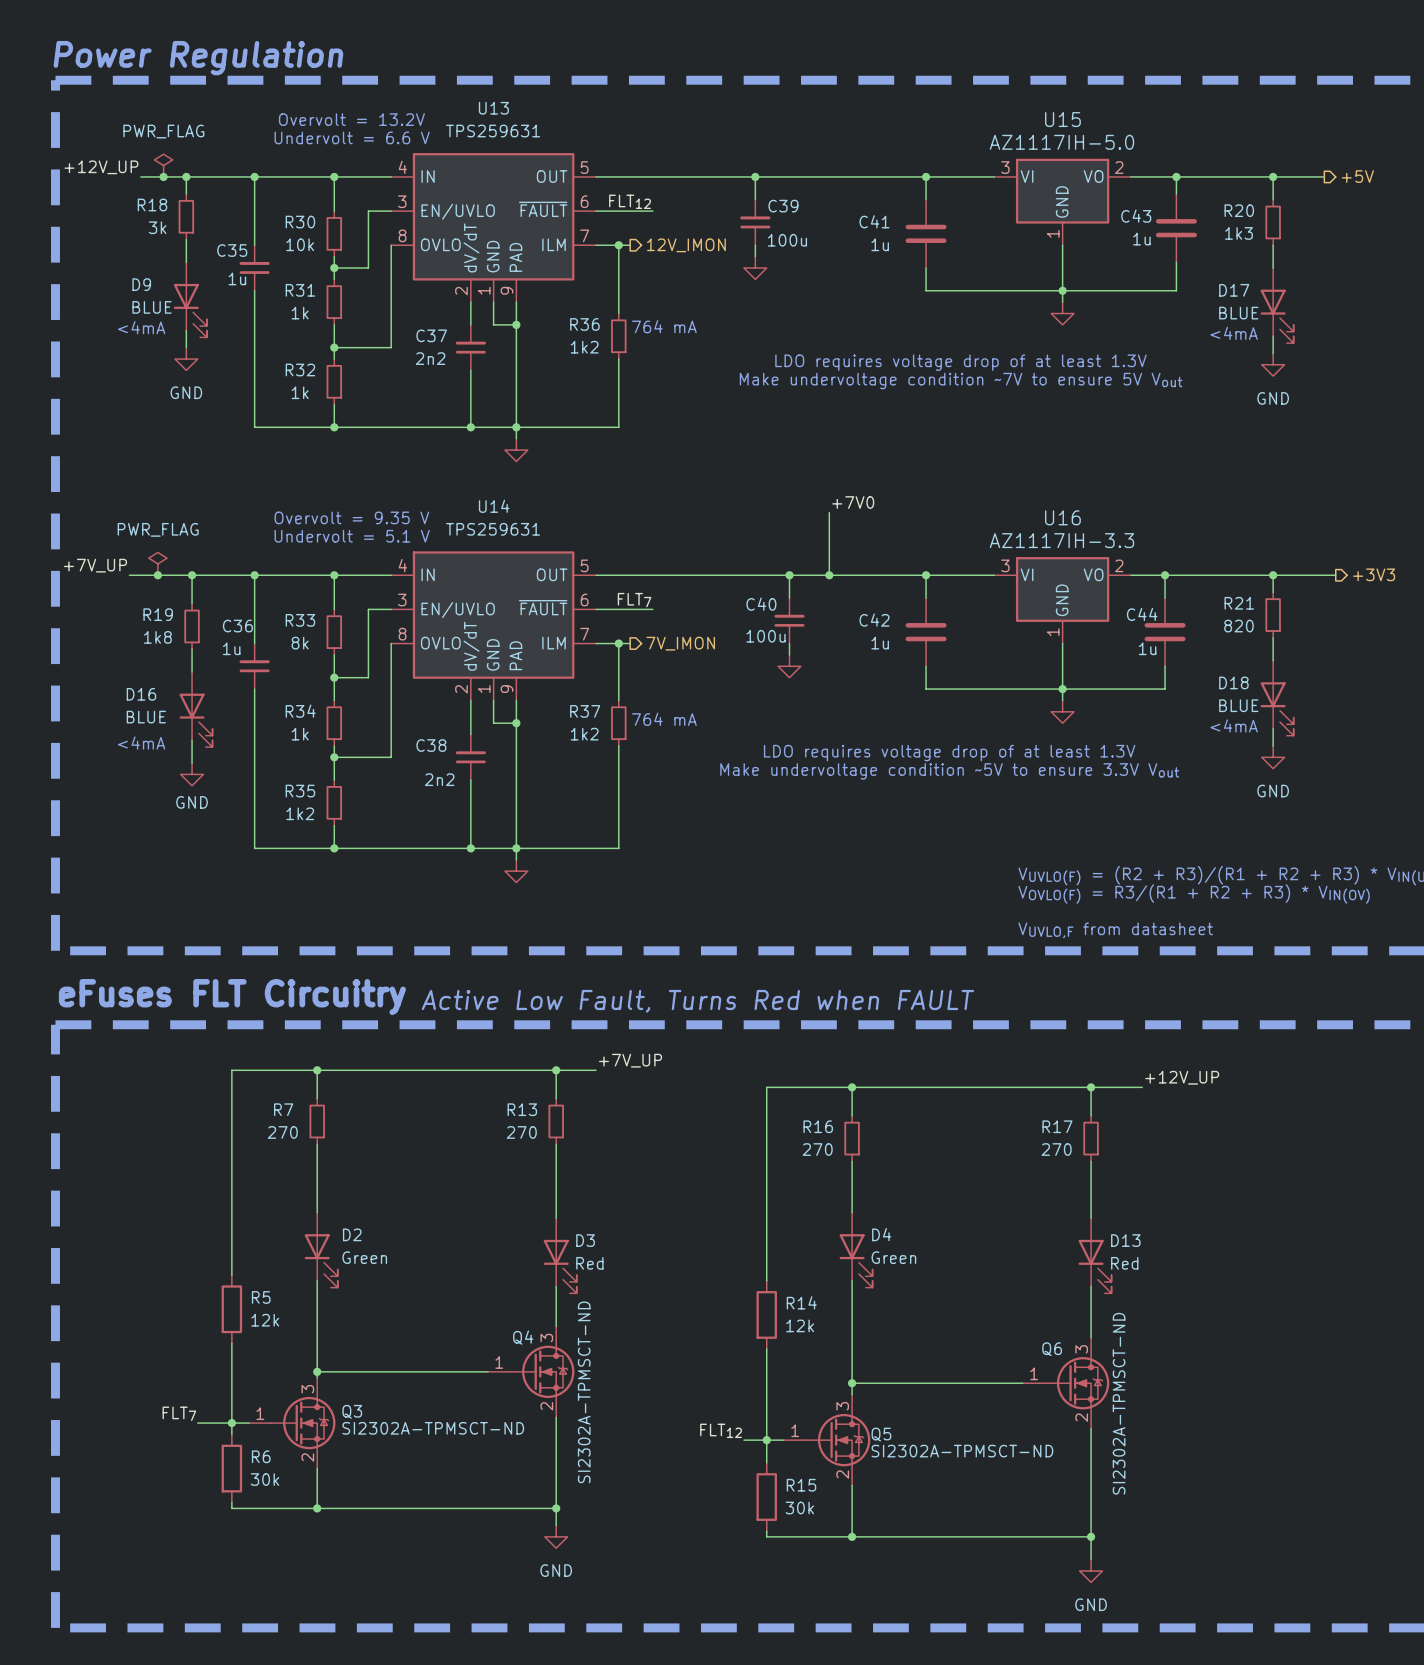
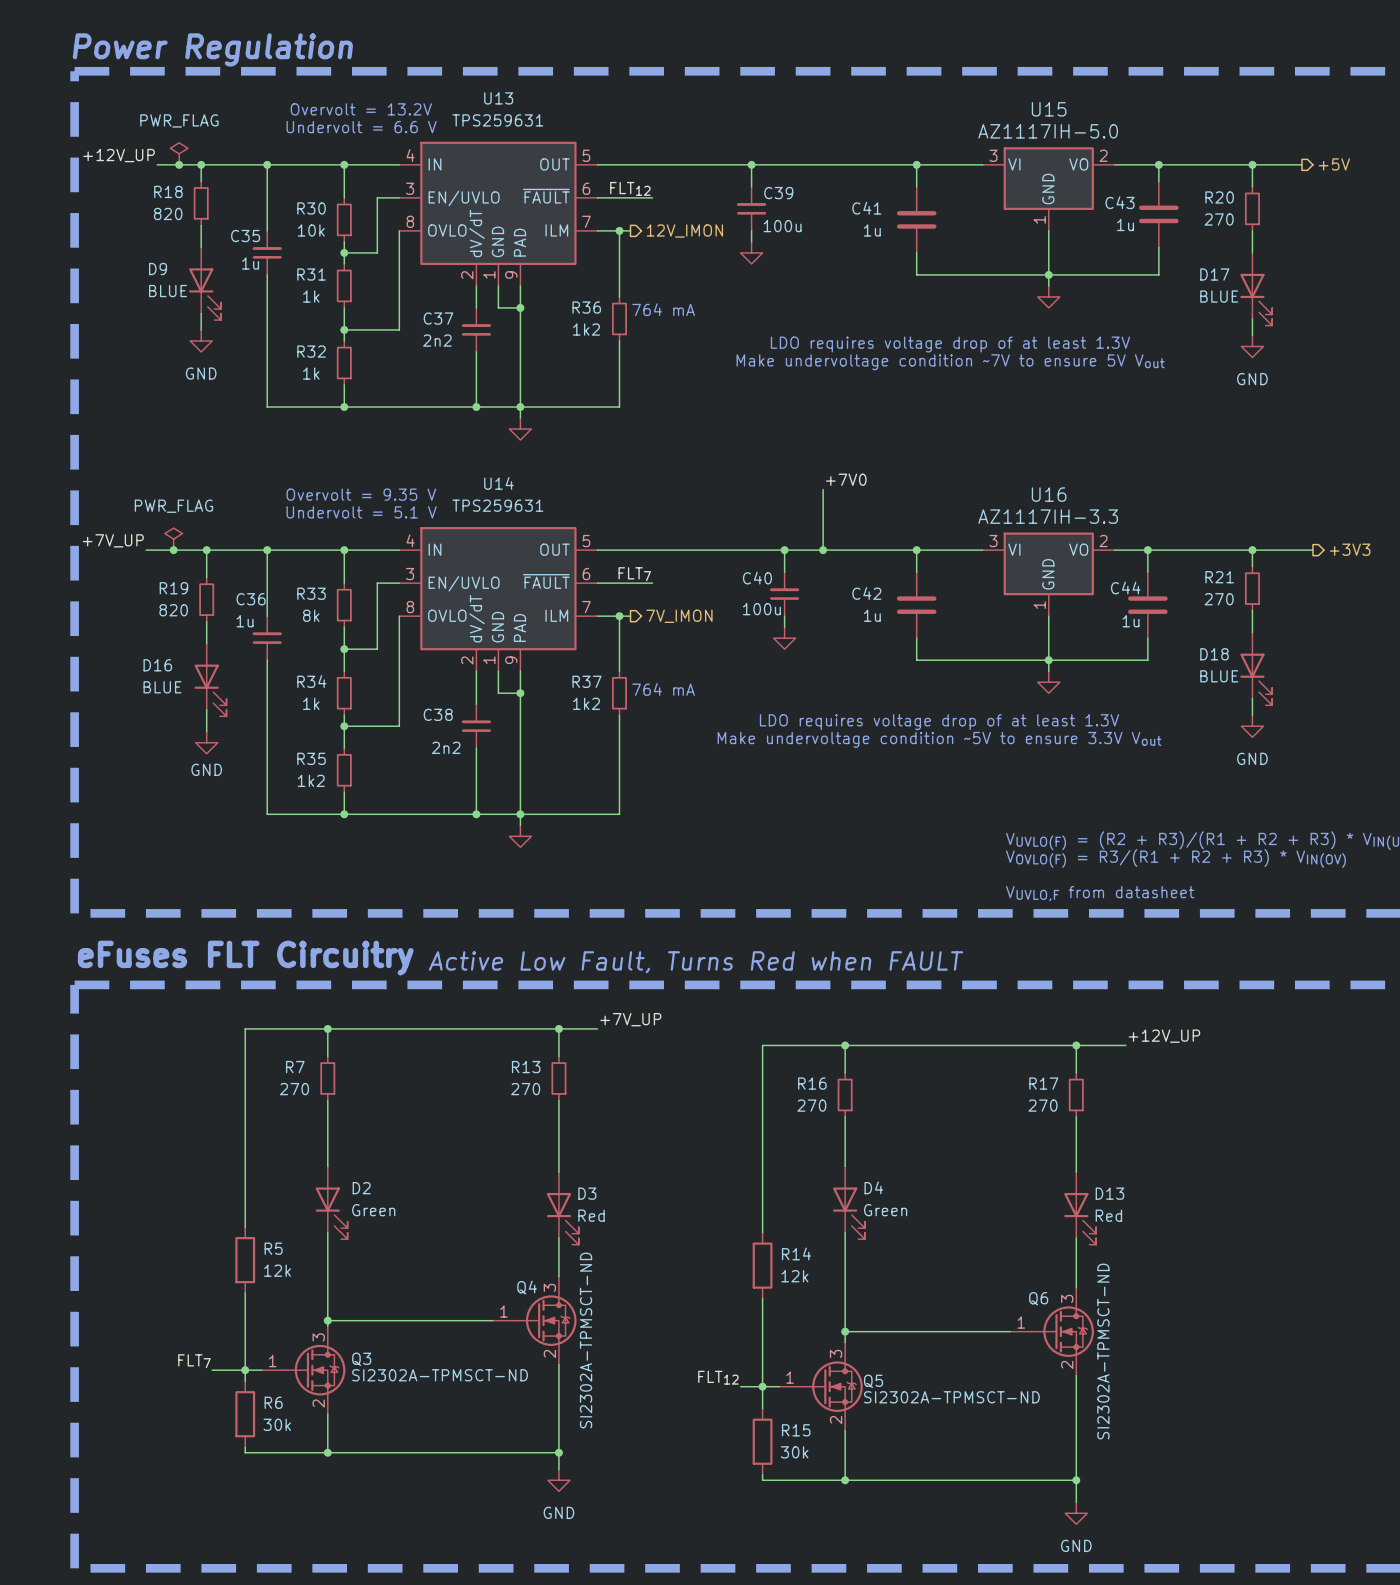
R18 value: 3k (157, 227) -> 820 (168, 213)
R20 value: 1k3 (1239, 233) -> 270 (1219, 219)
text: <4mA (141, 327) -> none
text: <4mA (1234, 333) -> none
R21 value: 820 (1239, 626) -> 270 (1219, 599)
R19 value: 1k8 (157, 637) -> 820 (173, 610)
text: <4mA (1234, 725) -> none
text: <4mA (141, 743) -> none

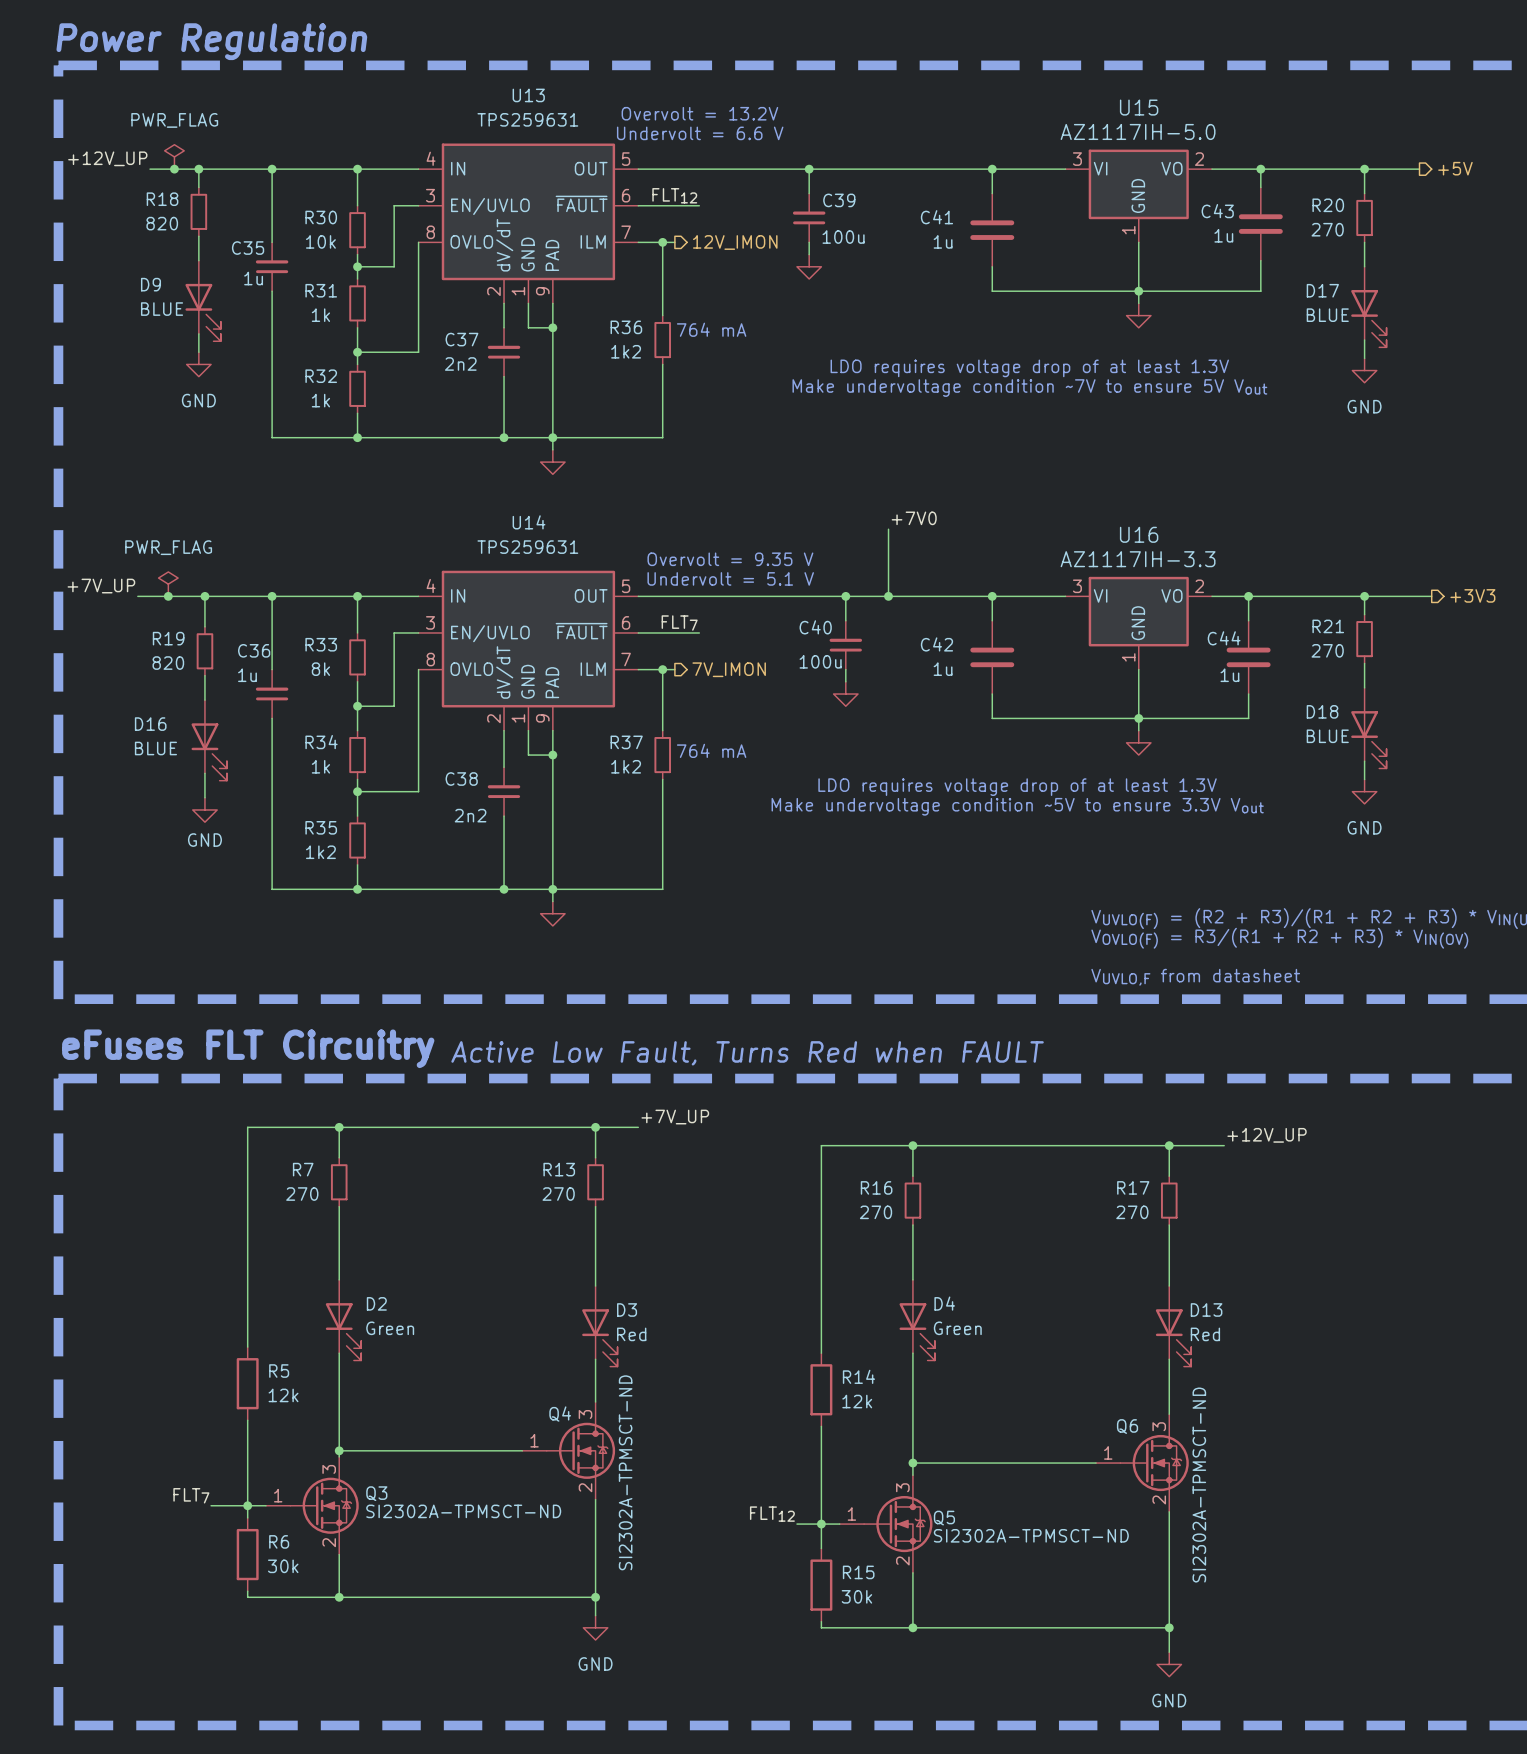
text: Overvolt = 13.2V (361, 109) -> none
text: none -> Overvolt = 13.2V (699, 113)
text: Undervolt = 6.6 V (361, 127) -> none
text: none -> Undervolt = 6.6 V (700, 133)
text: Overvolt = 9.35 V (361, 494) -> none
text: Undervolt = 5.1 V (361, 512) -> none
text: none -> Overvolt = 9.35 V (730, 559)
text: none -> Undervolt = 5.1 V (730, 578)

